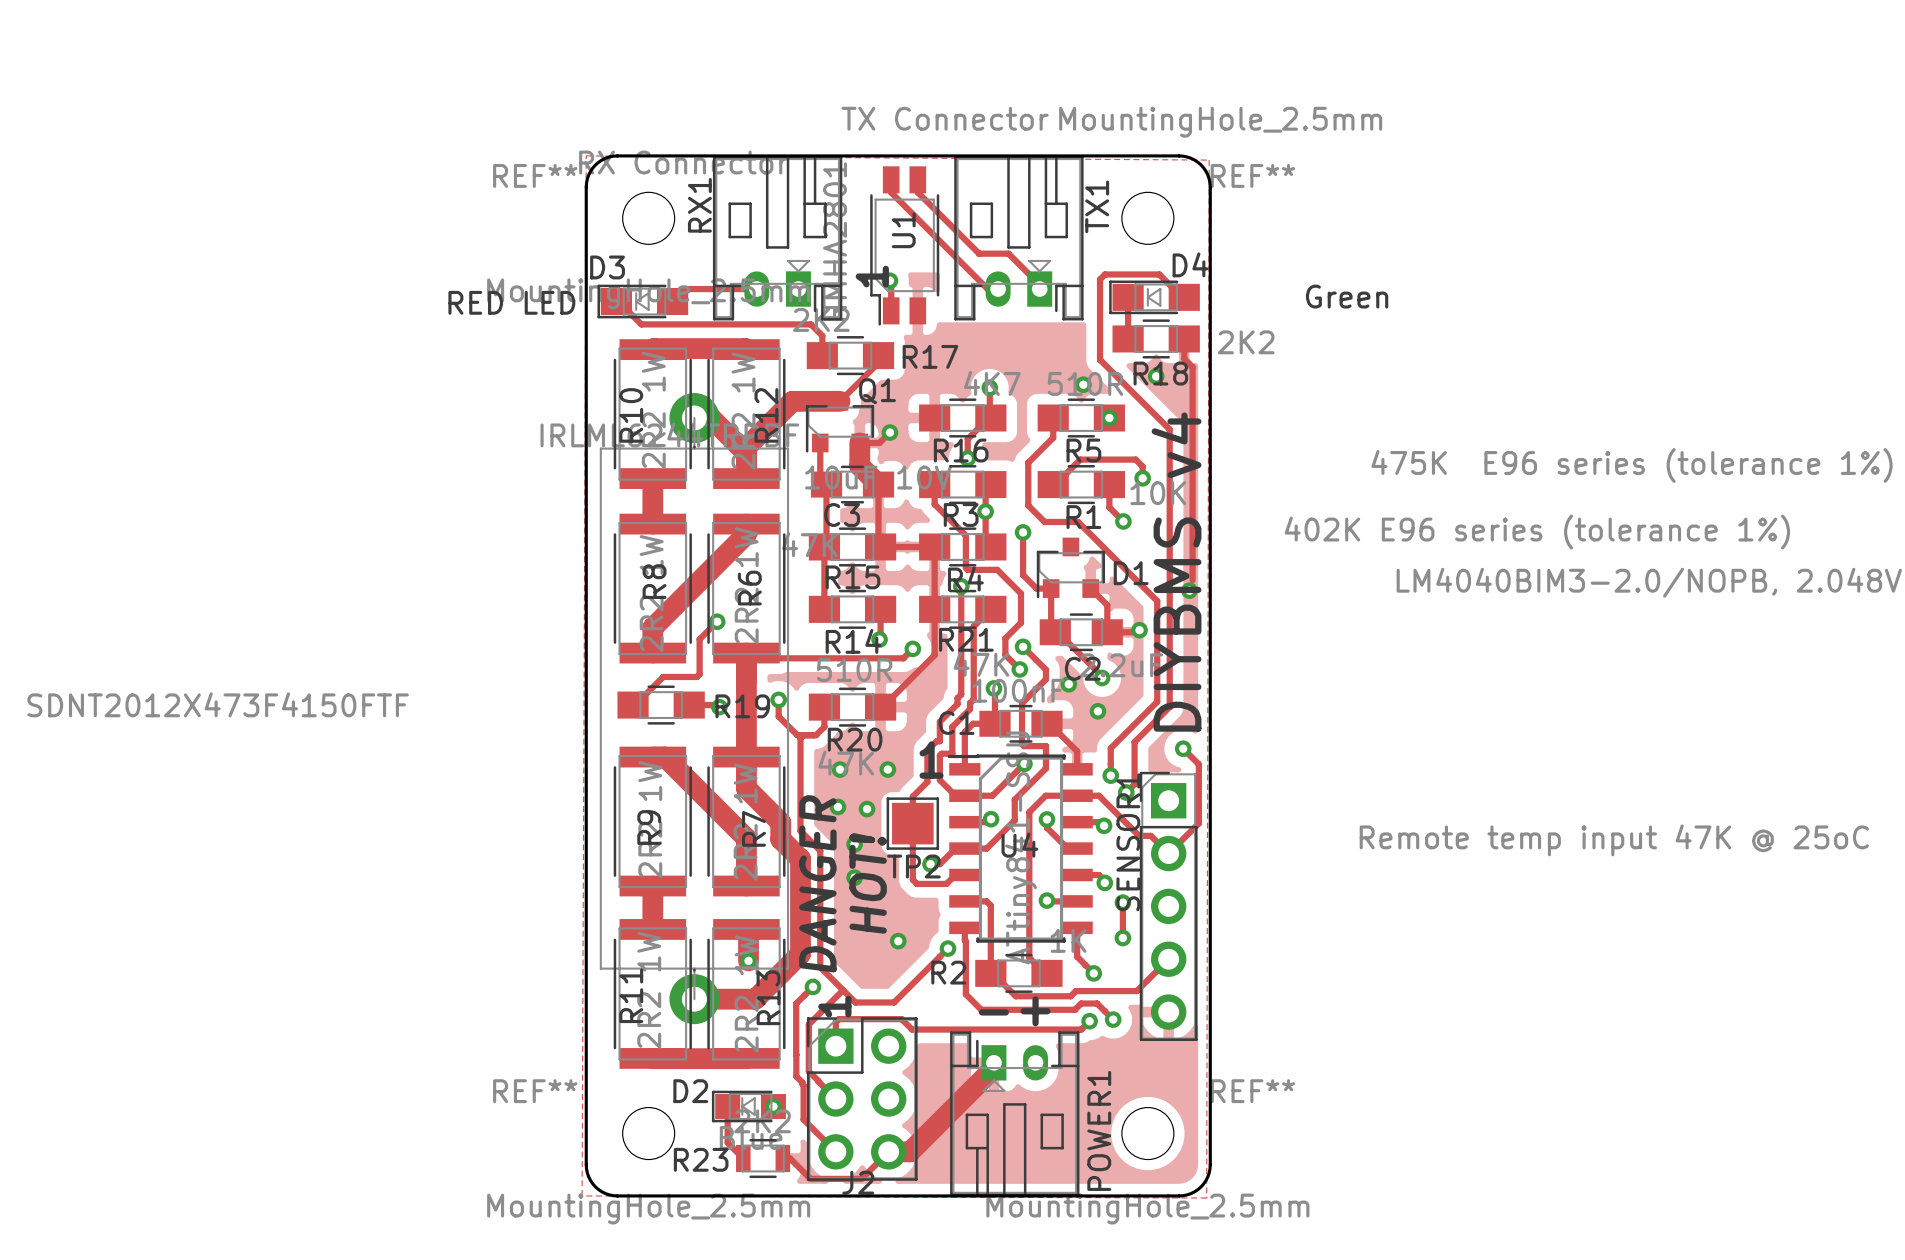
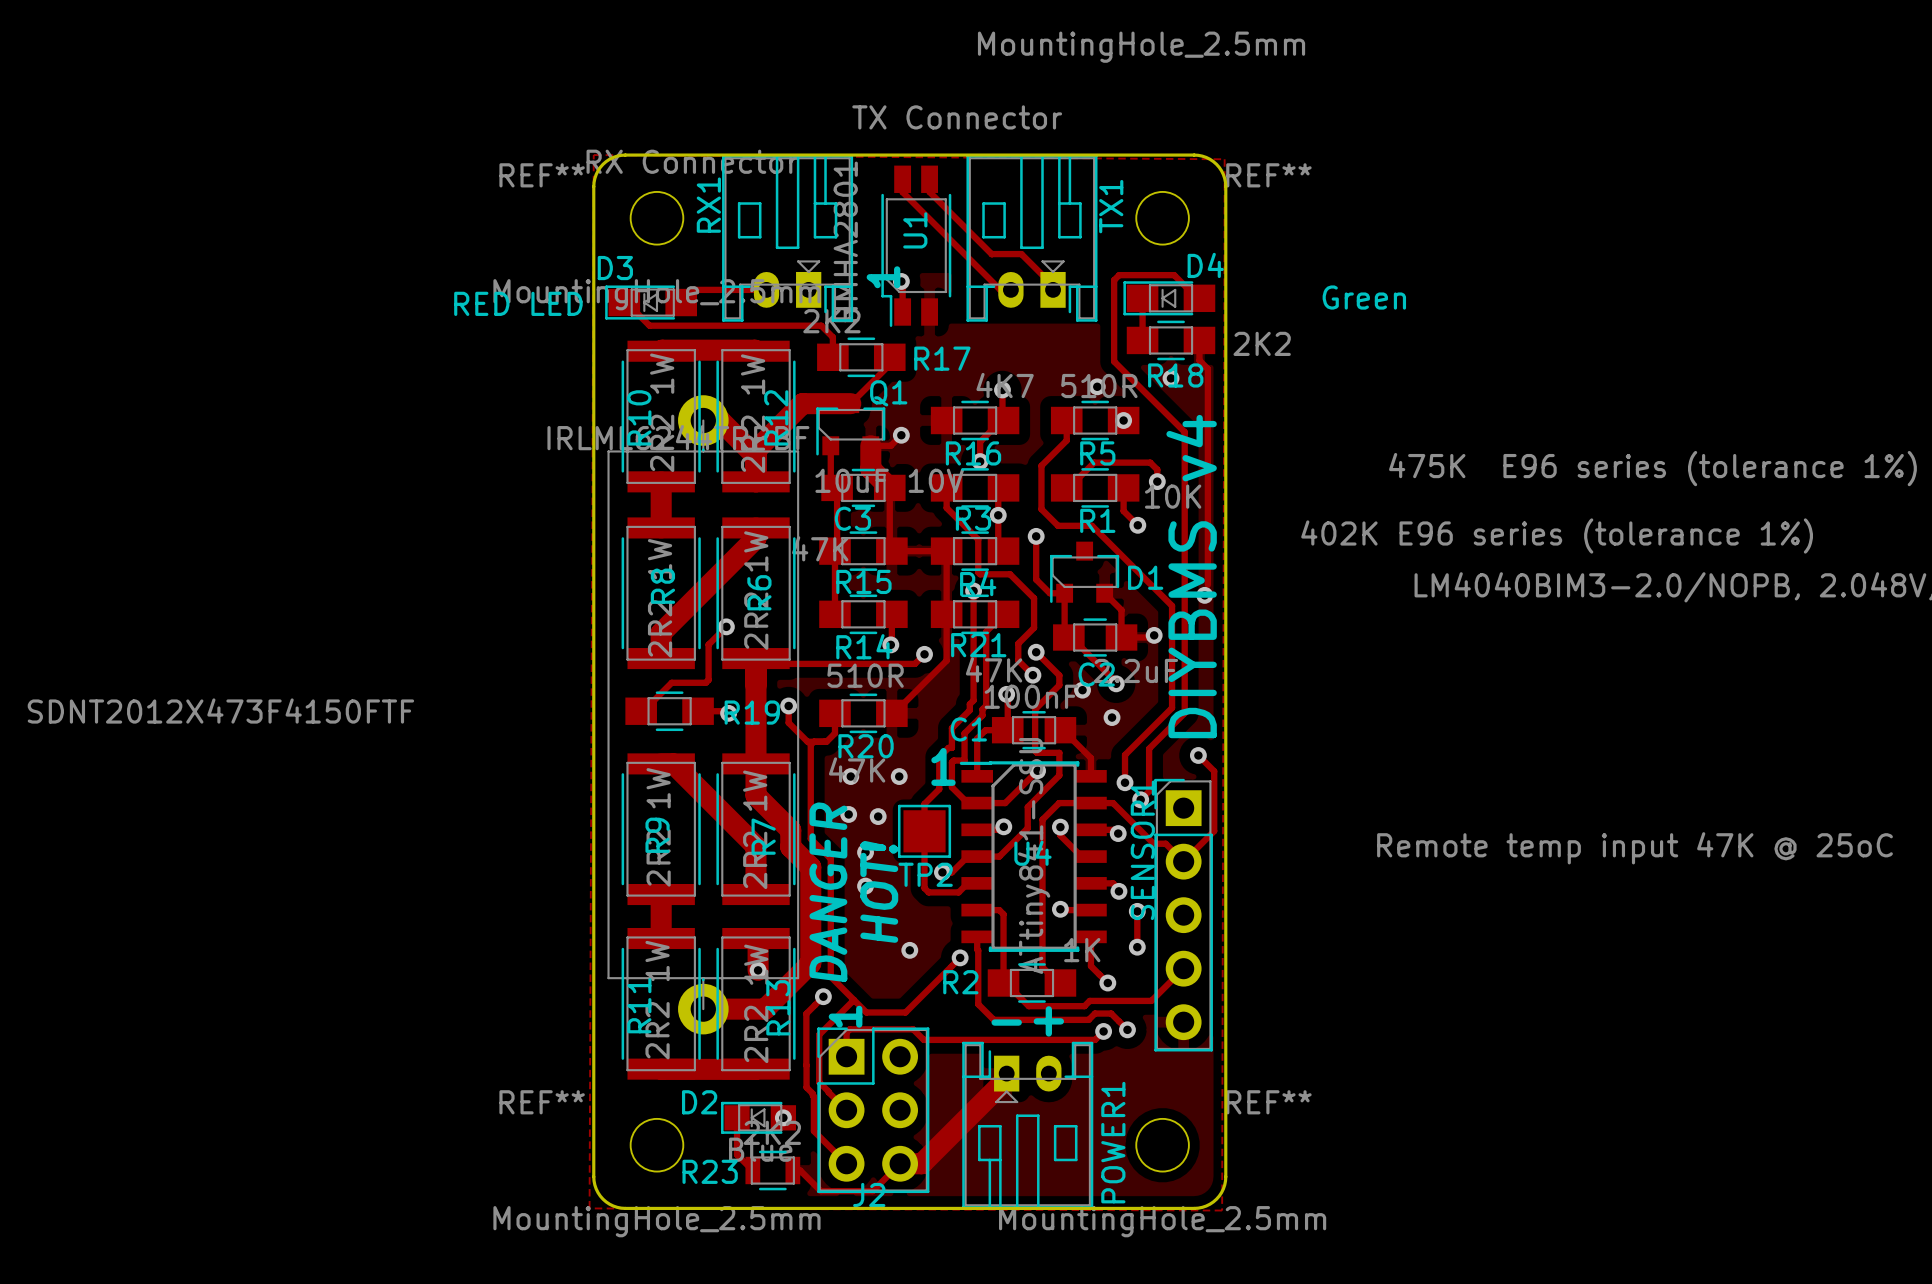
REF** value position: MountingHole_2.5mm (1220, 122) -> MountingHole_2.5mm (1141, 47)

